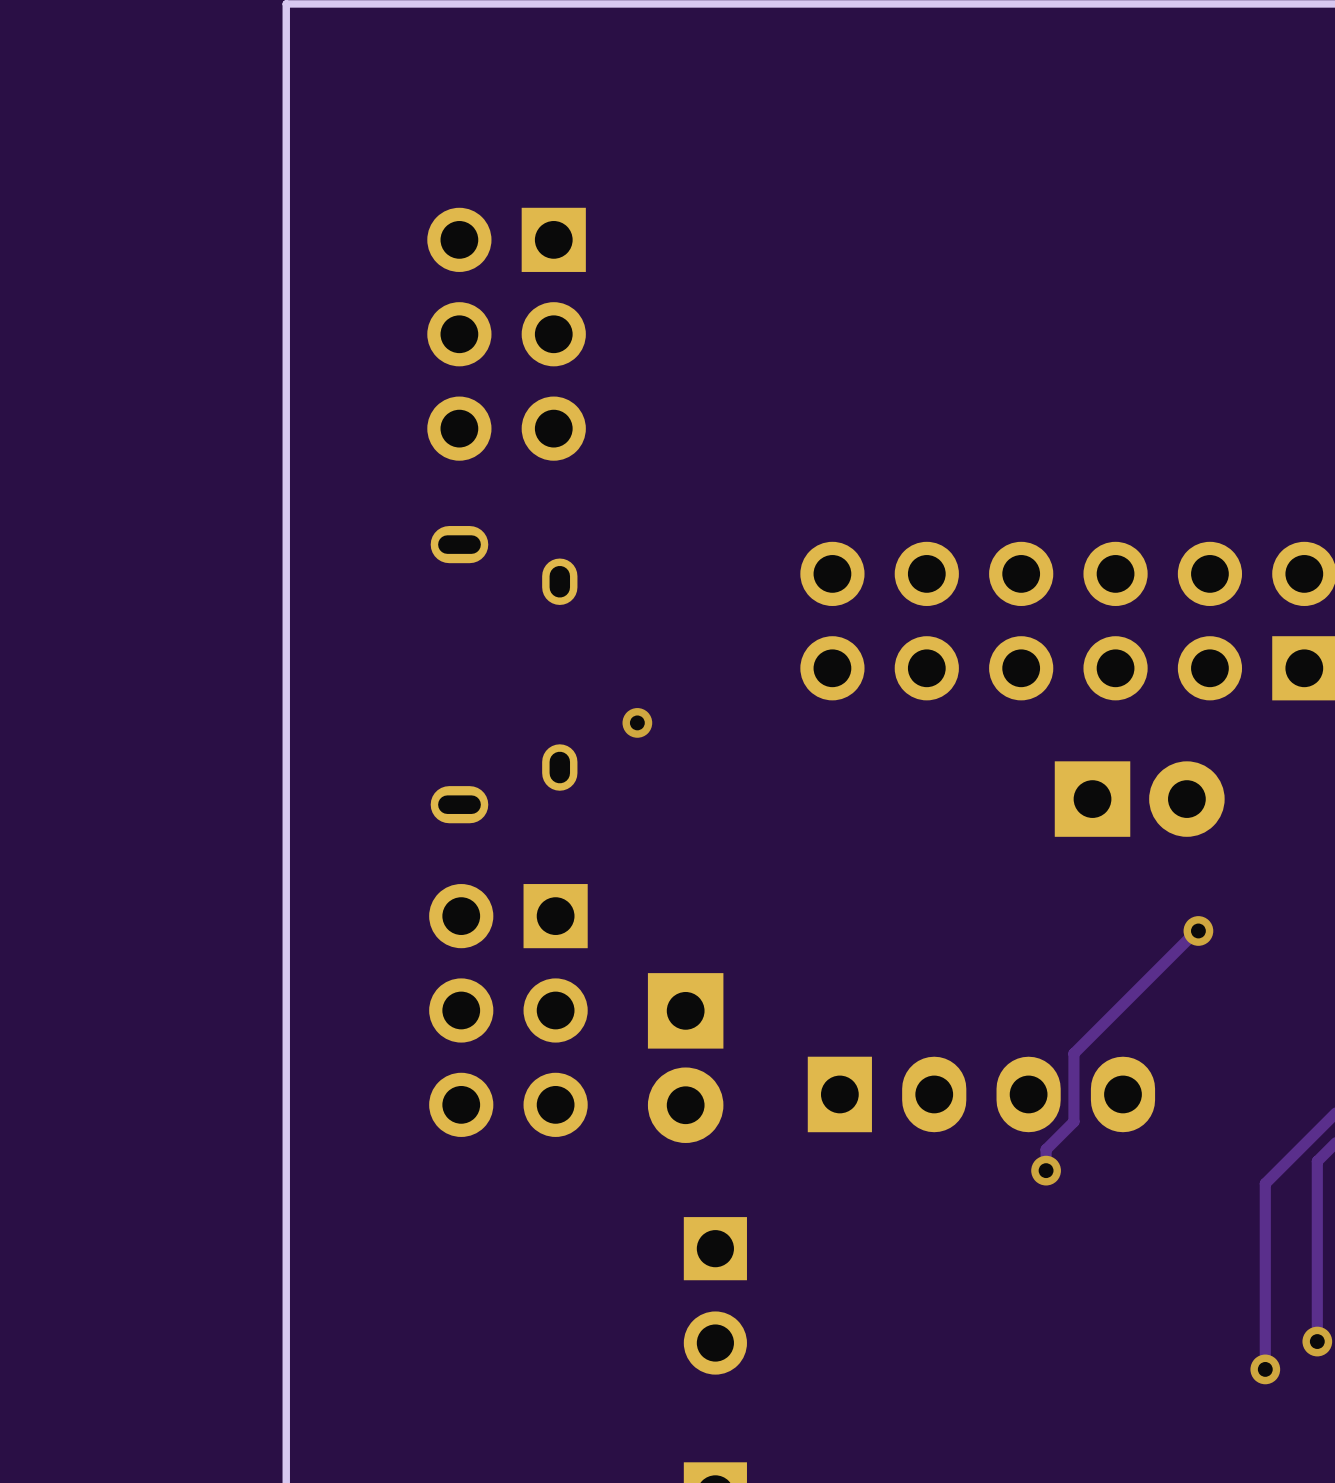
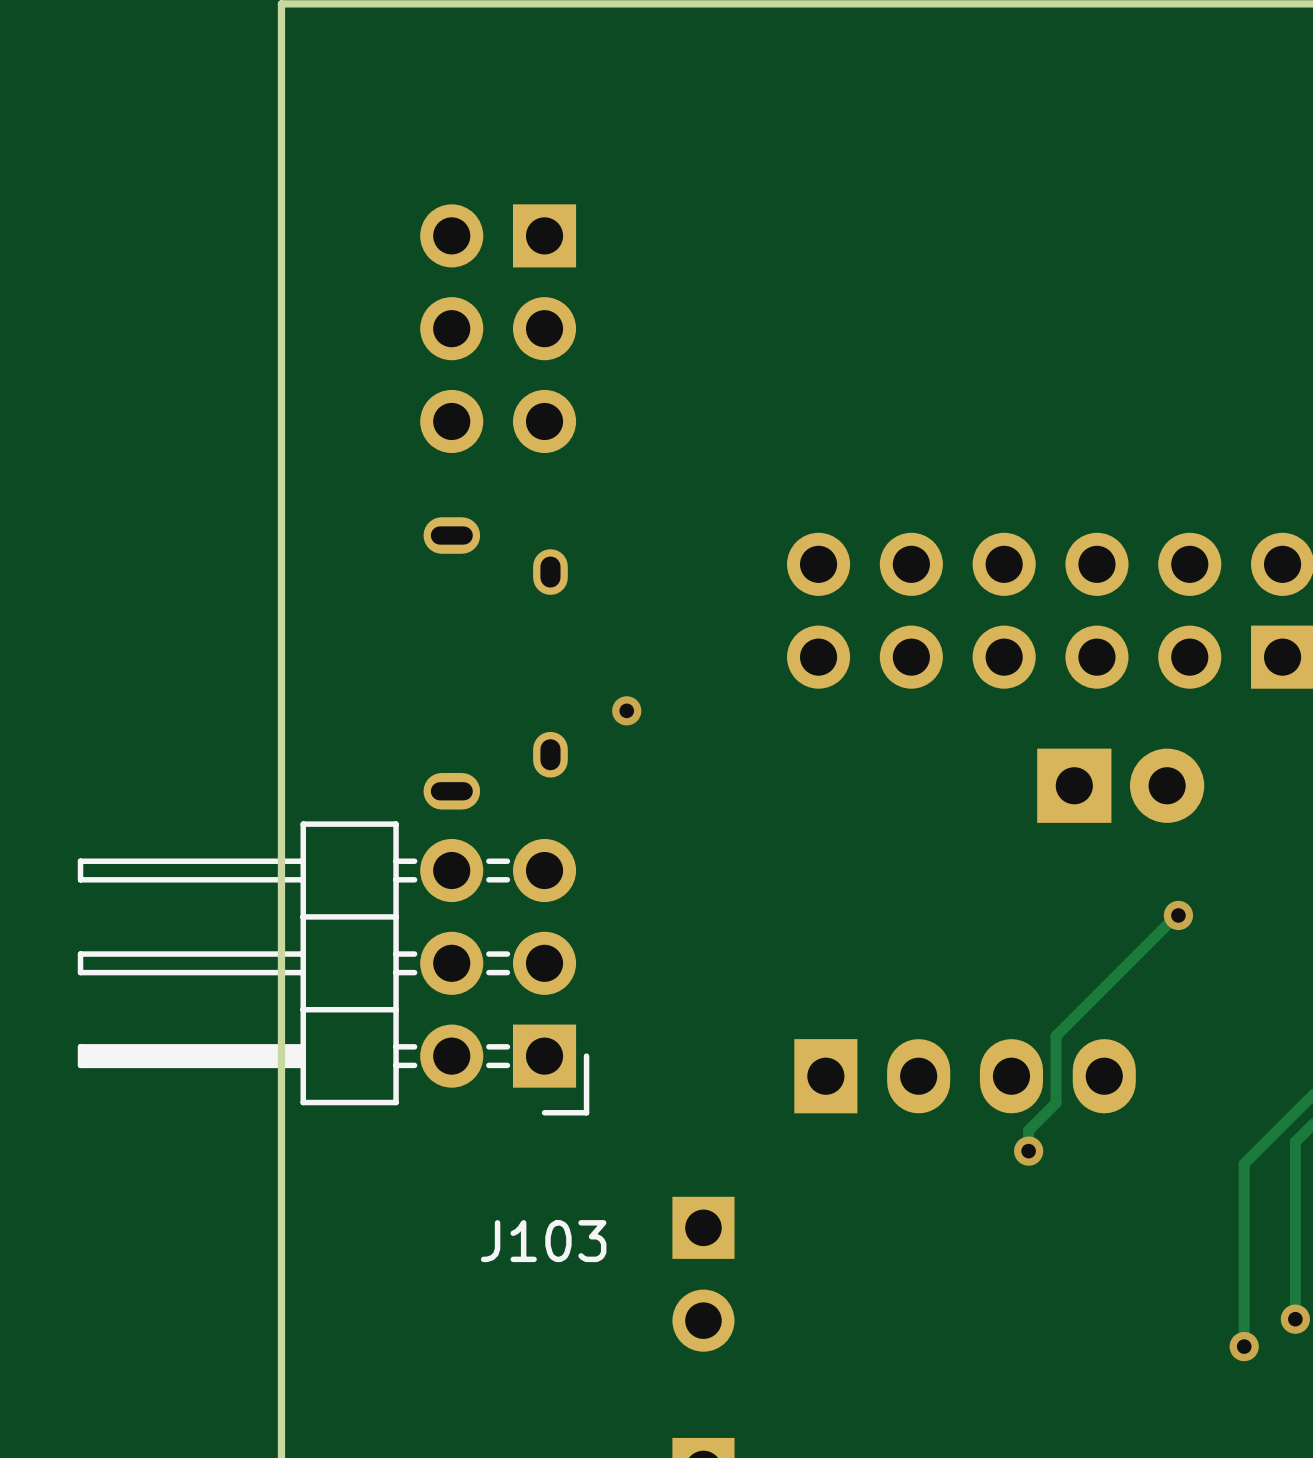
J103 side: top (508, 1010) -> bottom (333, 968)
part: (685, 1058) -> none

